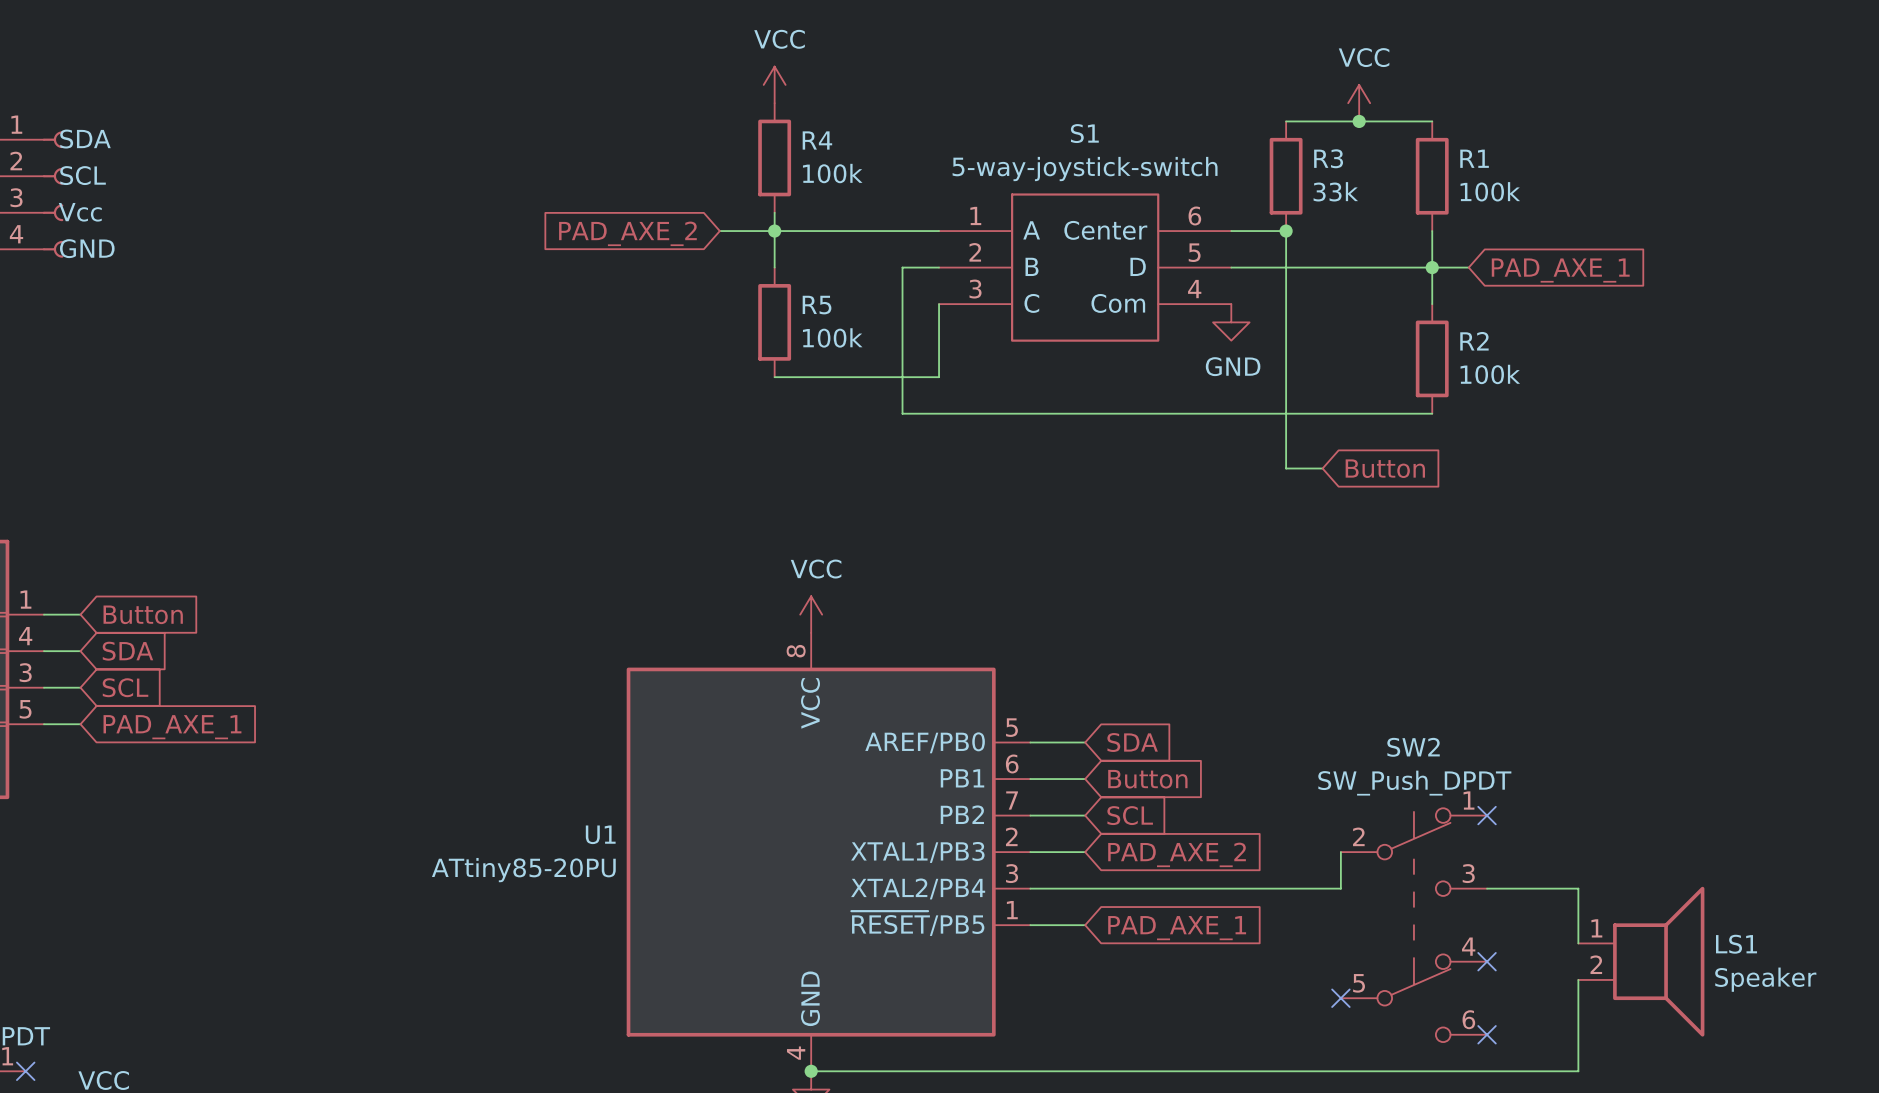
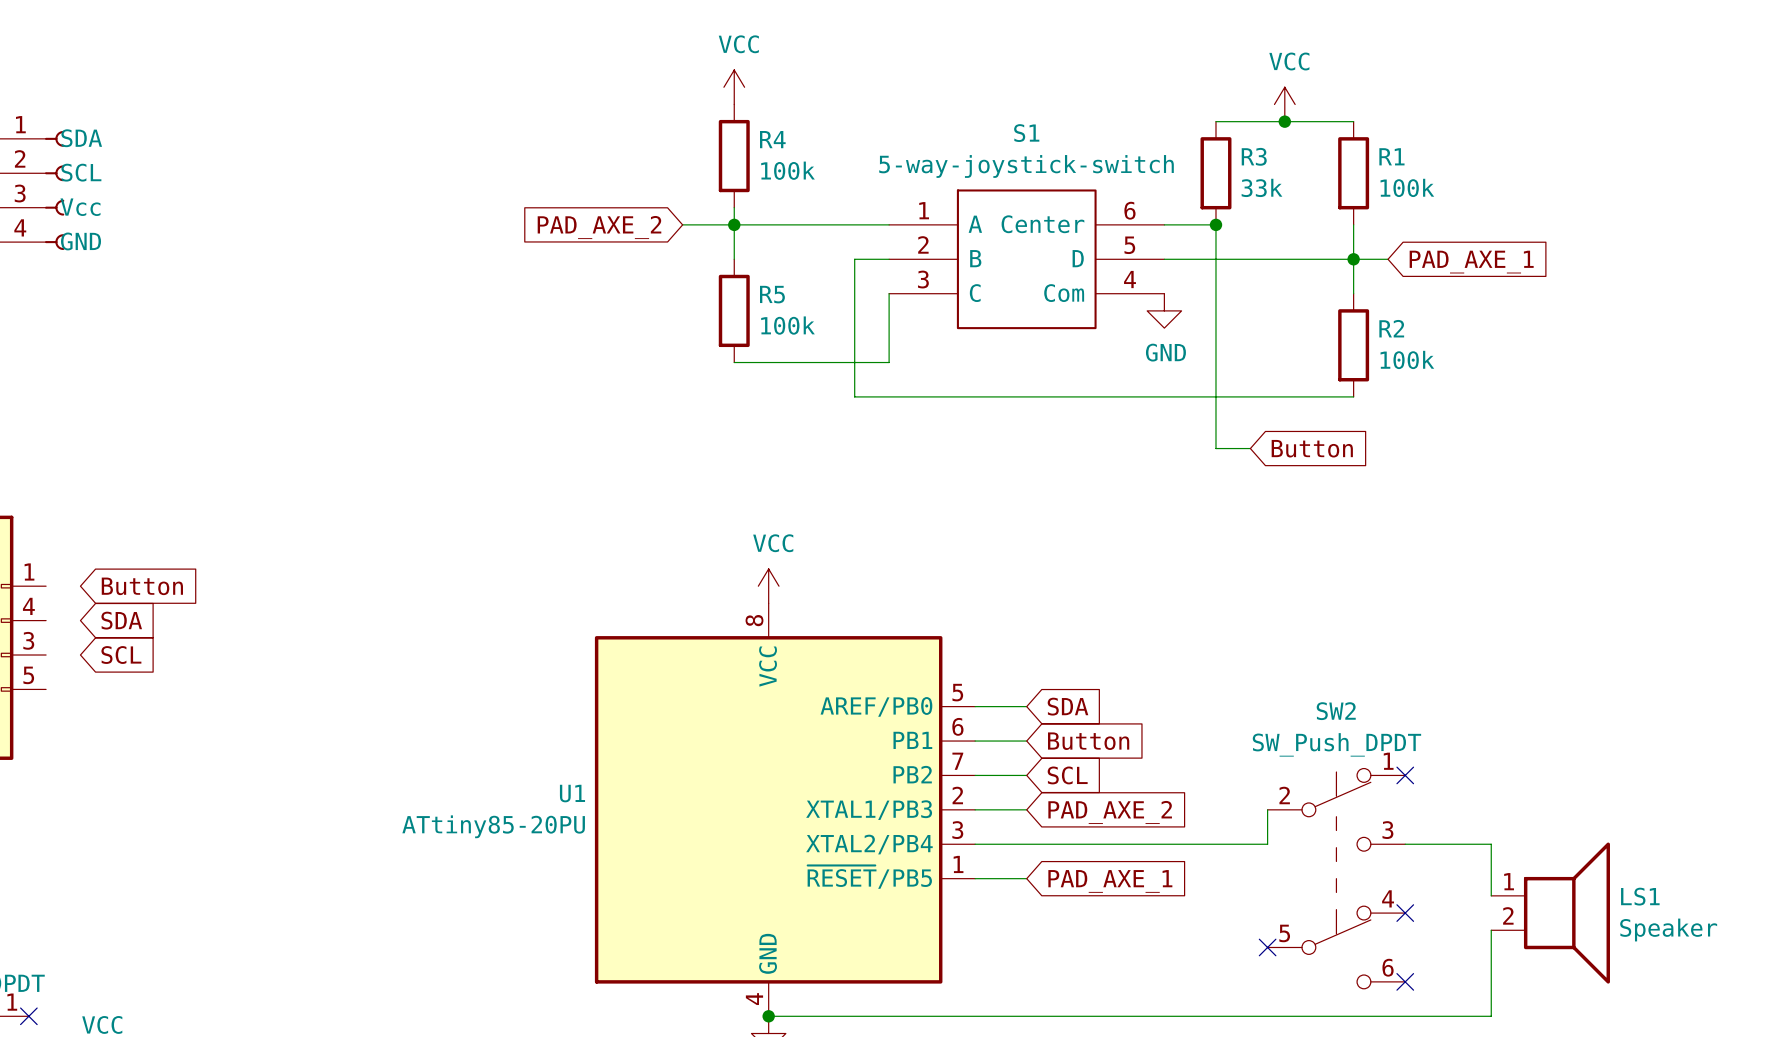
wire: (43, 614) (80, 614) -> none
wire: (43, 651) (80, 651) -> none
wire: (43, 687) (80, 687) -> none
wire: (43, 724) (80, 724) -> none
global label: PAD_AXE_1 (172, 727) -> none

